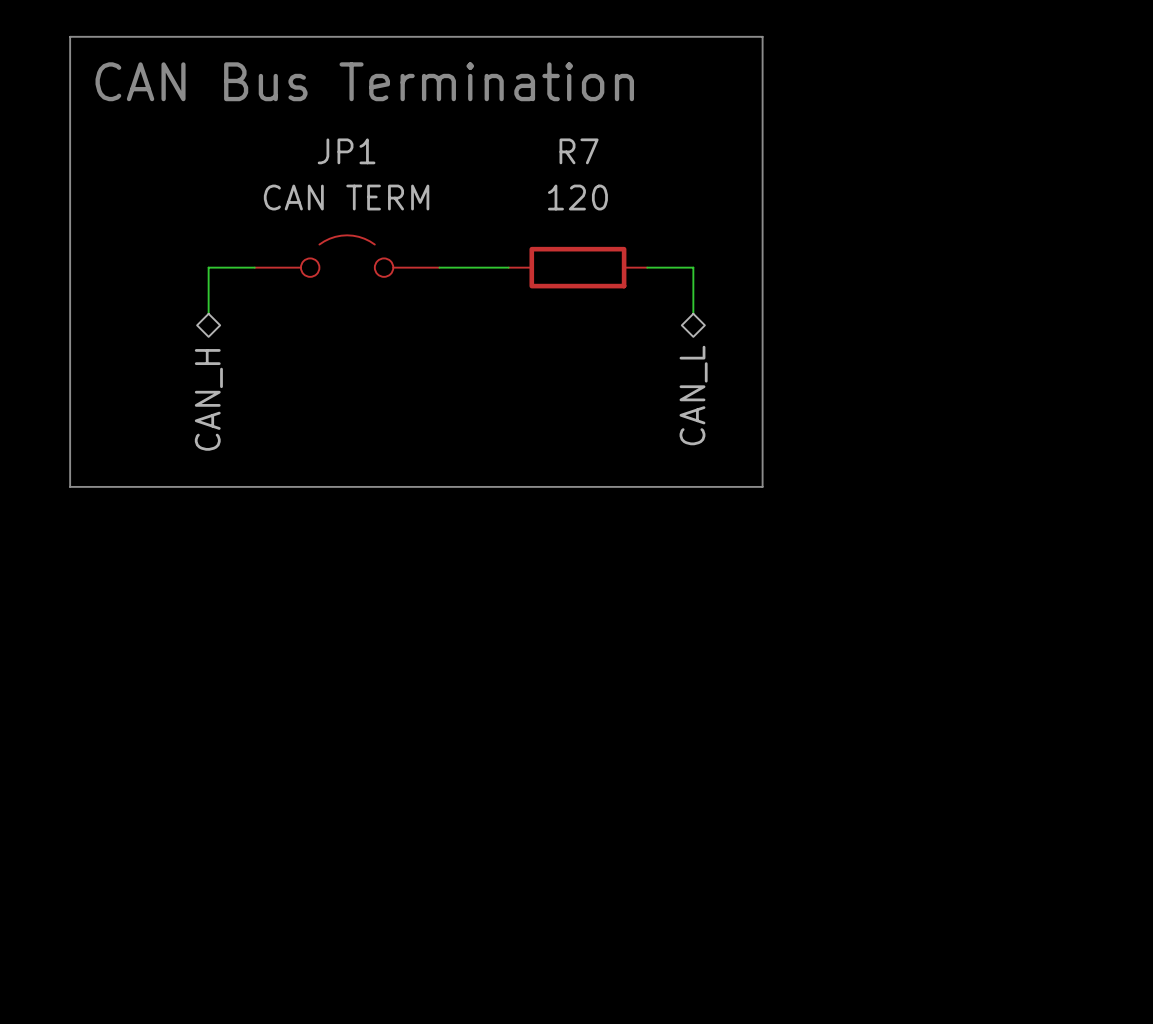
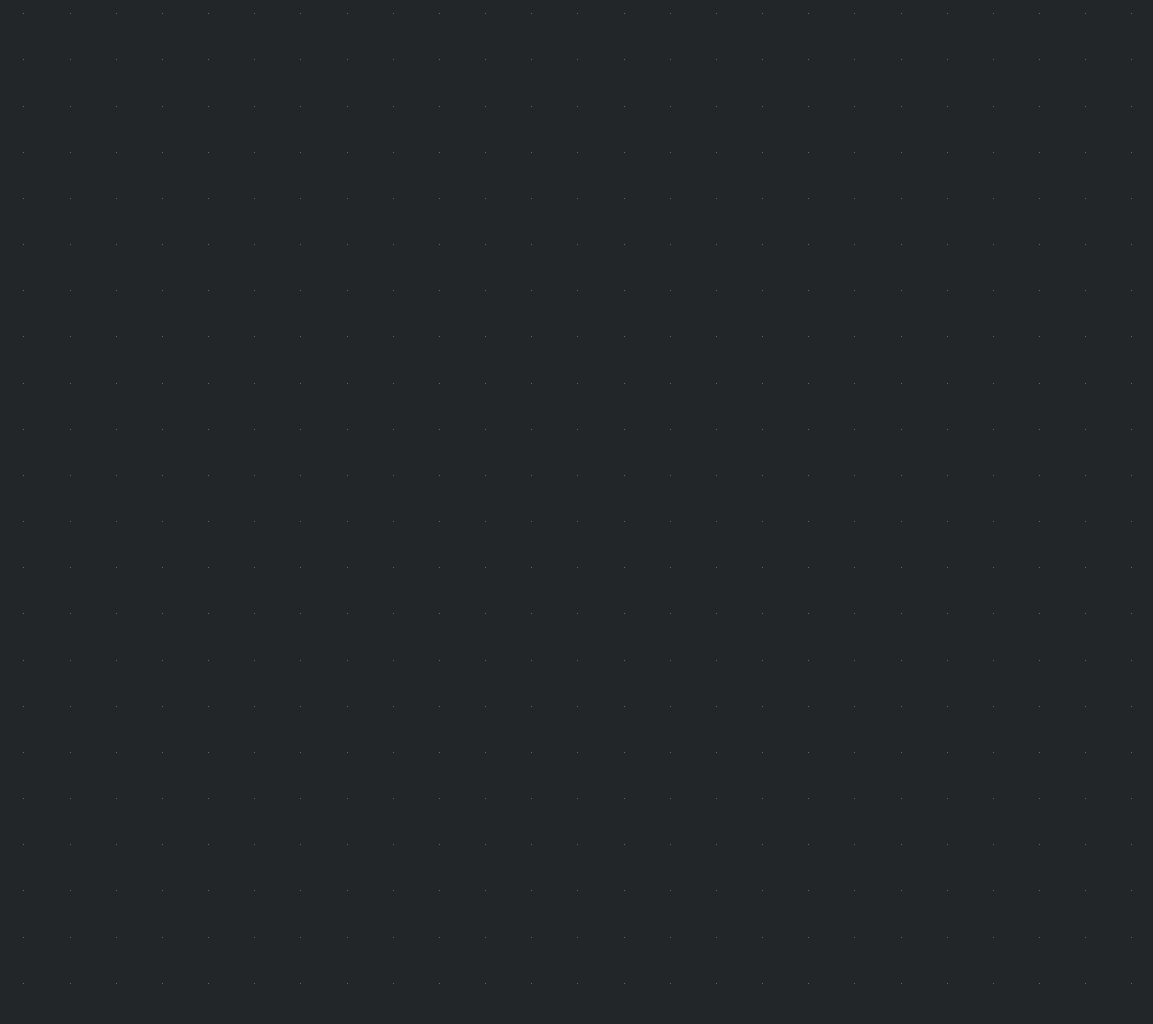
line: (70, 36) (762, 36) (762, 486) (70, 486) (70, 36) -> none
text: CAN Bus Termination (364, 81) -> none
JP1: CAN TERM (347, 256) -> none
wire: (254, 267) (208, 267) (208, 313) -> none
wire: (439, 267) (508, 267) -> none
R7: 120 (577, 267) -> none
wire: (647, 267) (693, 267) (693, 313) -> none
hierarchical label: CAN_L (693, 395) -> none
hierarchical label: CAN_H (208, 399) -> none

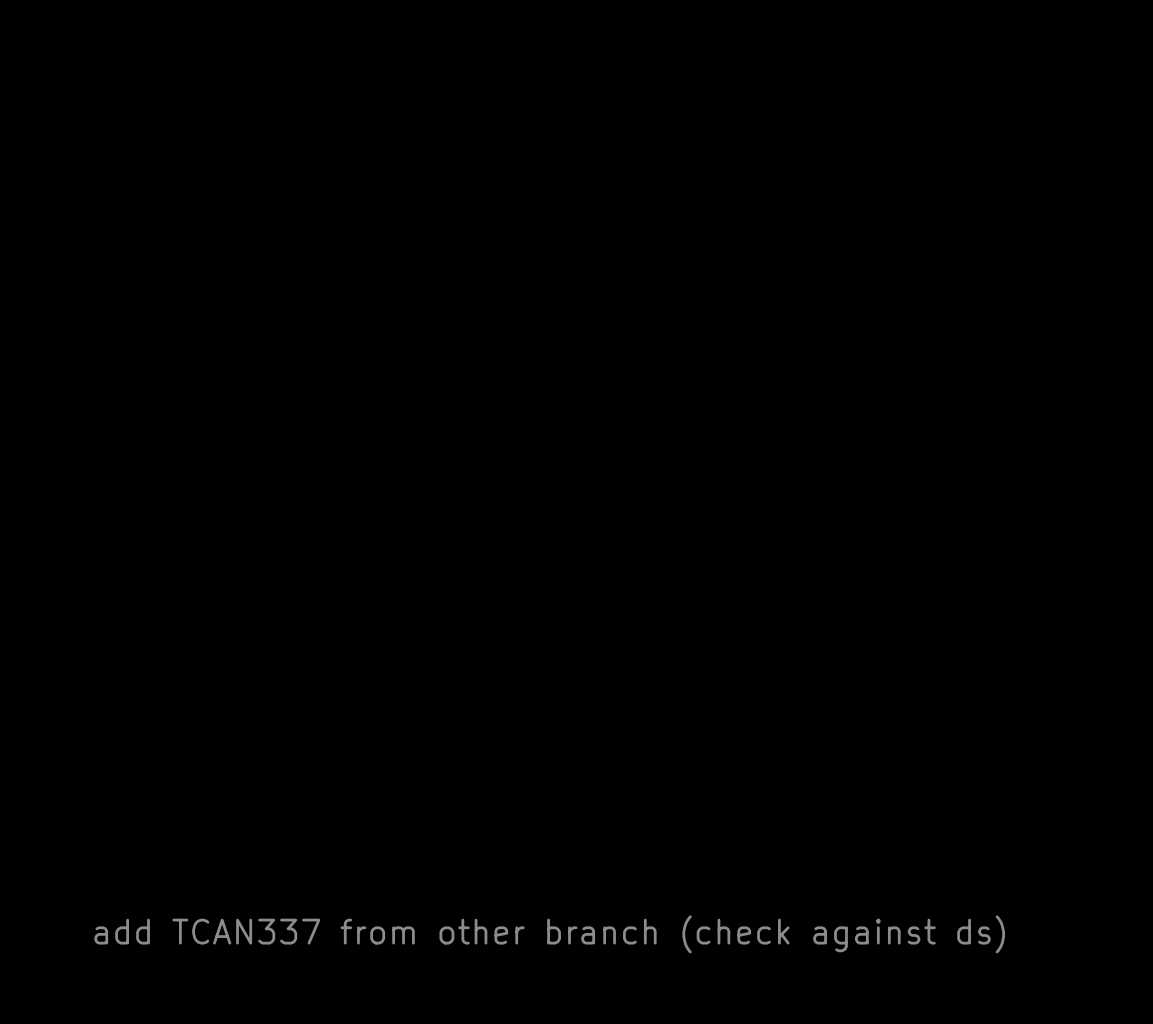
text: none -> add TCAN337 from other branch (check against ds) (549, 934)

